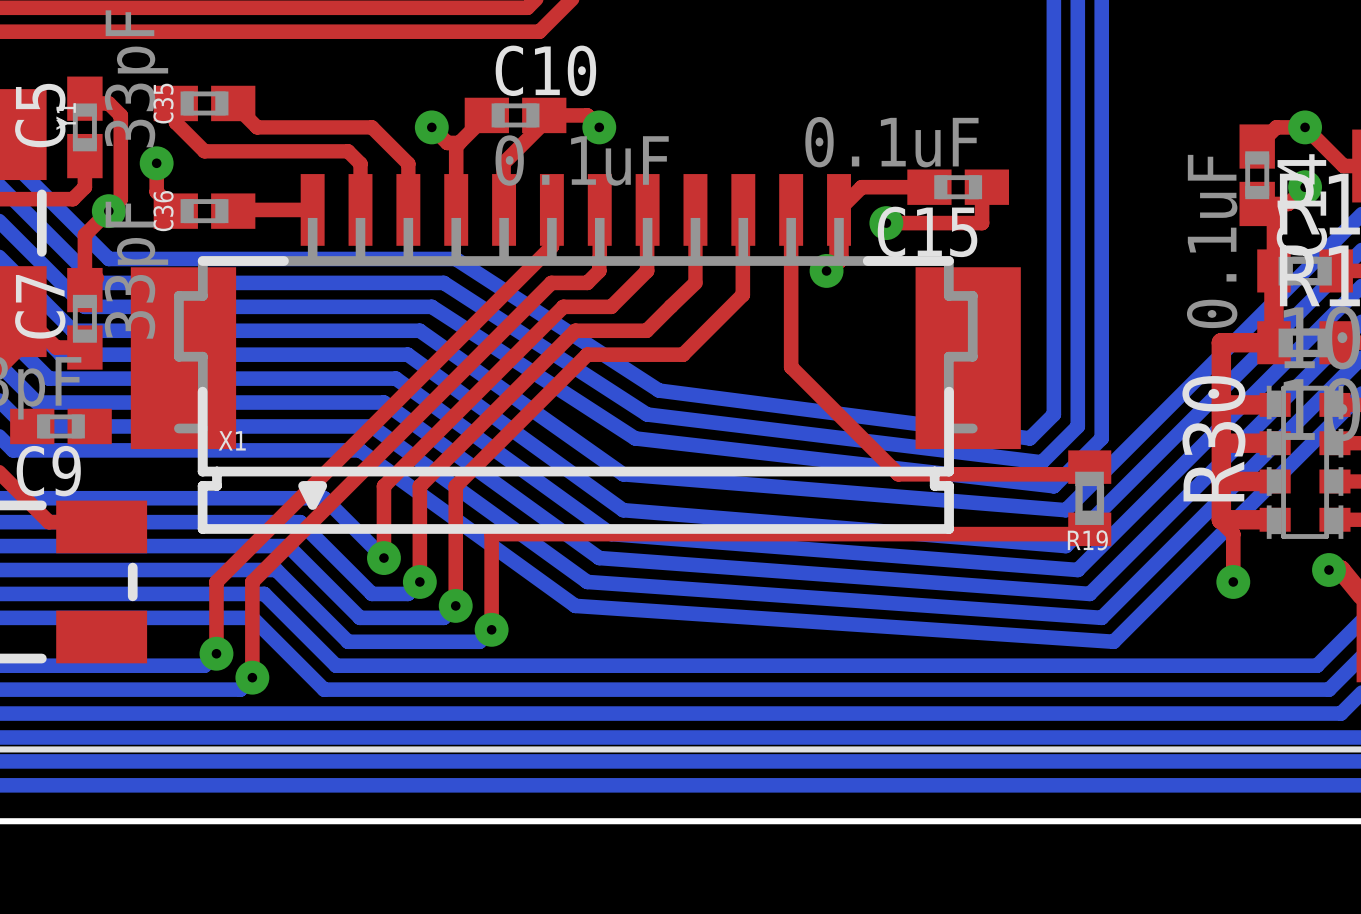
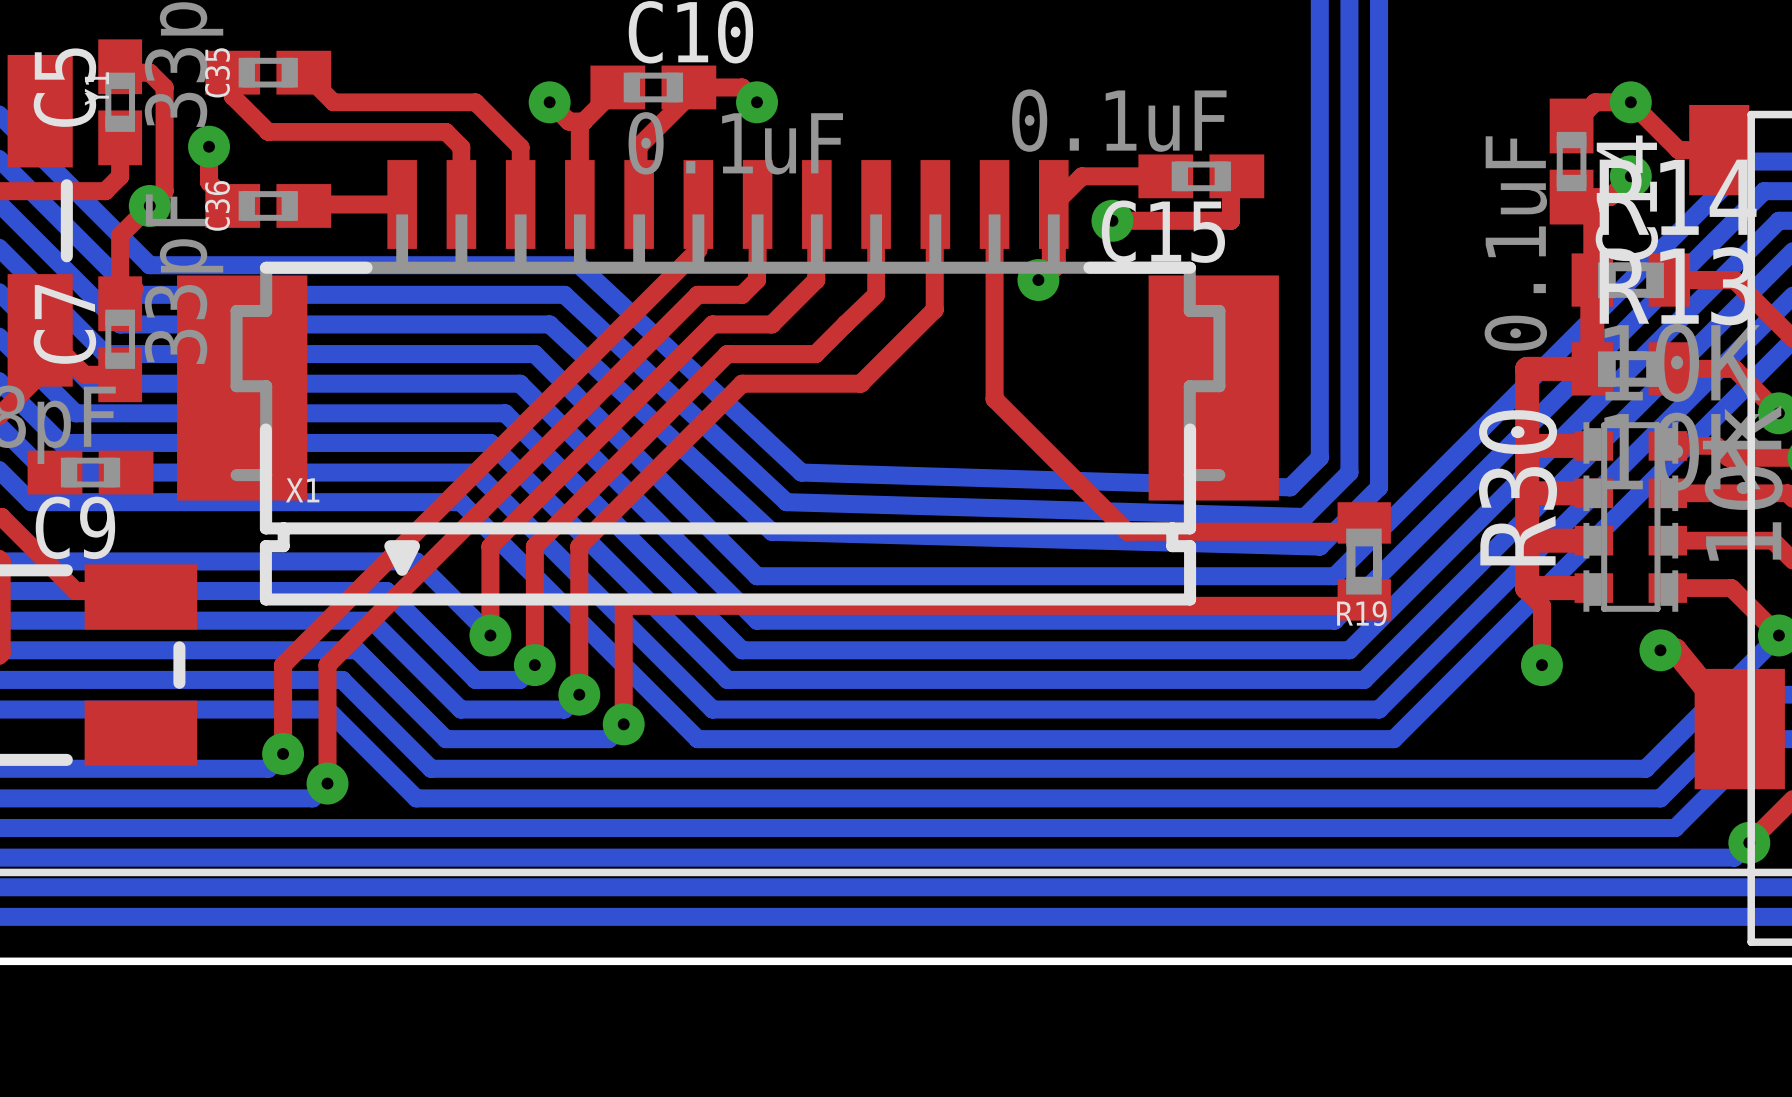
bottom track: (455, 258) (659, 390) (1029, 438) -> (579, 265) (801, 472) (1290, 487)
bottom track: (443, 282) (647, 414) (1041, 462) -> (564, 294) (786, 502) (1305, 516)
bottom track: (431, 306) (635, 438) (1053, 486) -> (549, 324) (771, 531) (1319, 546)
bottom track: (419, 330) (623, 474) (1065, 510) -> (534, 354) (757, 576) (1334, 576)
bottom track: (407, 354) (623, 510) (1065, 546) -> (520, 383) (757, 620) (1334, 620)
bottom track: (395, 378) (611, 534) (1077, 570) -> (505, 413) (742, 650) (1349, 650)
bottom track: (383, 402) (599, 558) (1089, 593) -> (490, 442) (727, 679) (1364, 679)
bottom track: (371, 426) (587, 581) (1101, 617) -> (475, 472) (712, 709) (1379, 709)
bottom track: (360, 450) (575, 605) (1113, 641) -> (460, 502) (697, 739) (1393, 739)

